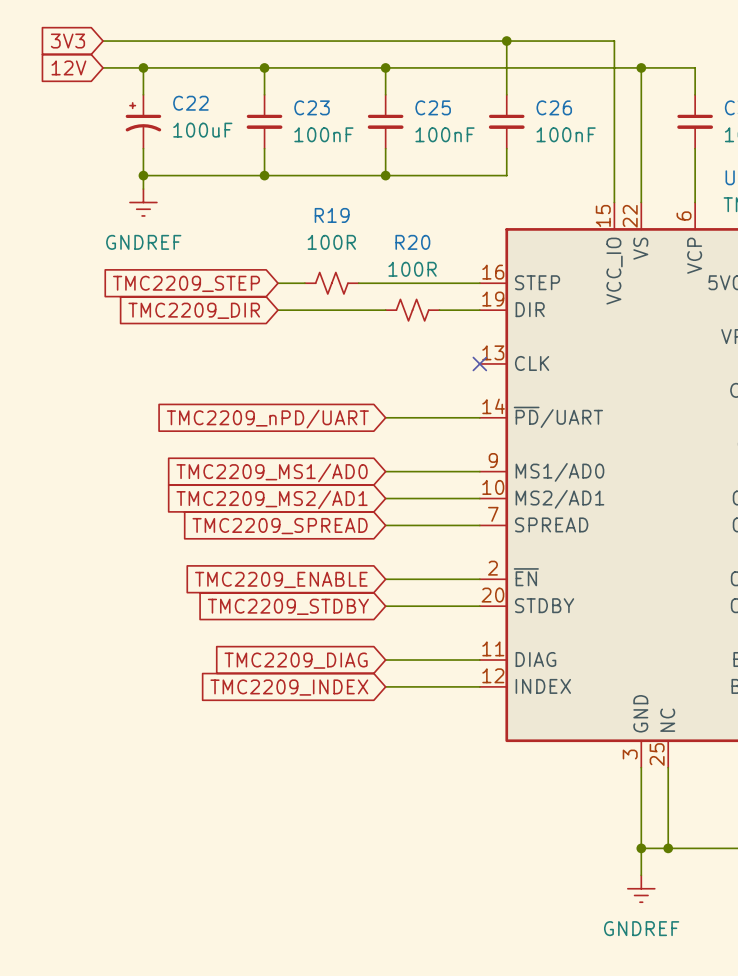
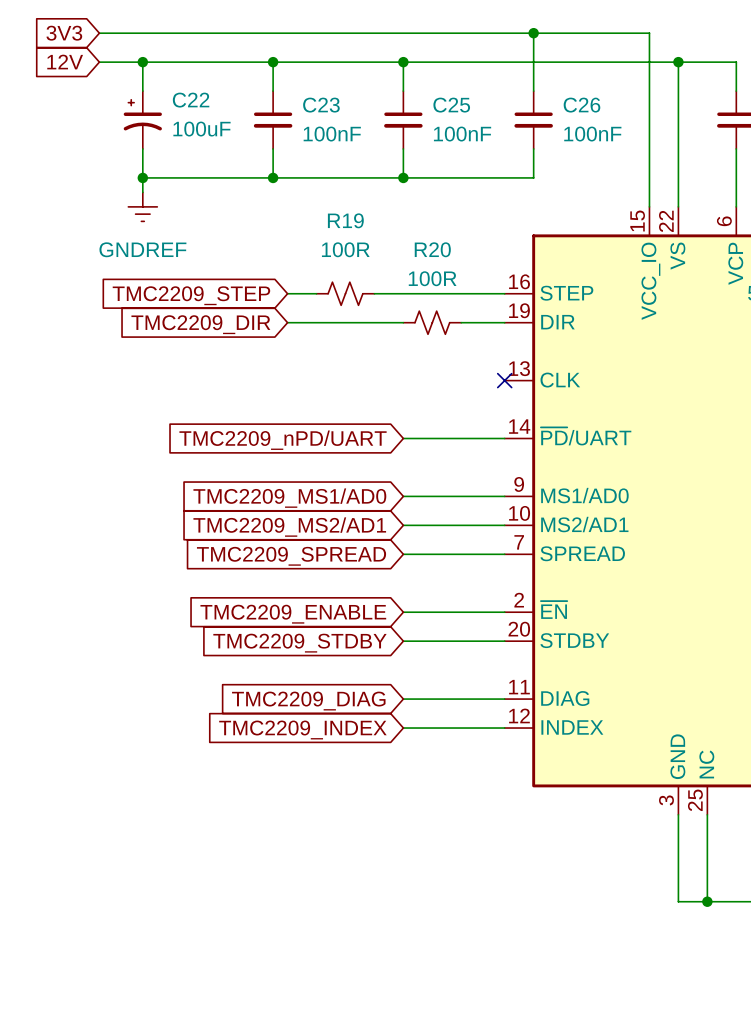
wire: (641, 848) (641, 875) -> none
junction: (641, 848) -> none
power symbol: GNDREF (641, 888) -> none

